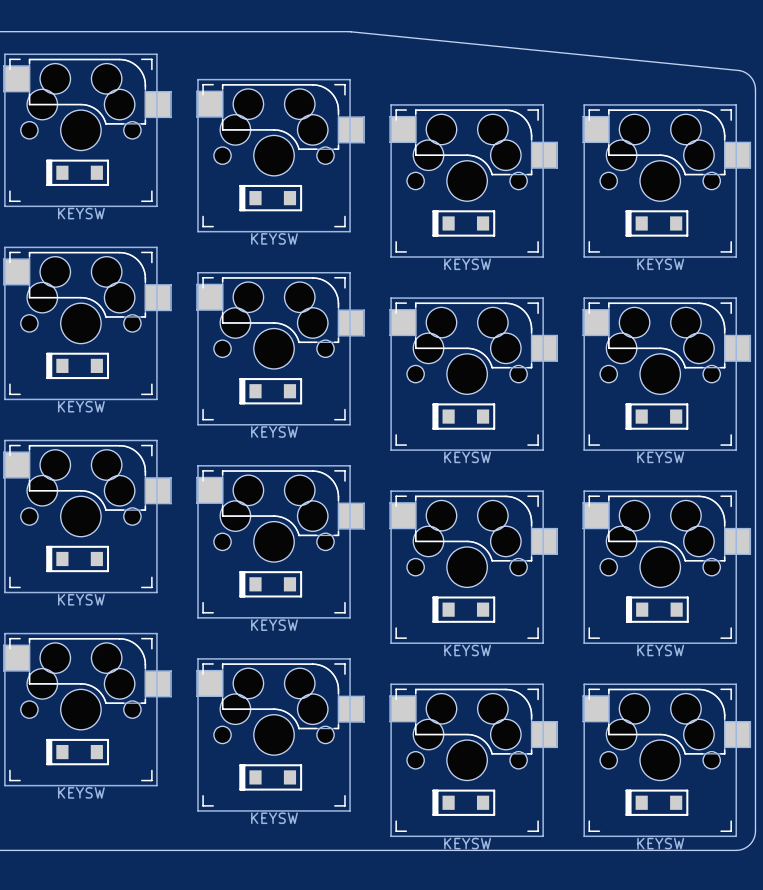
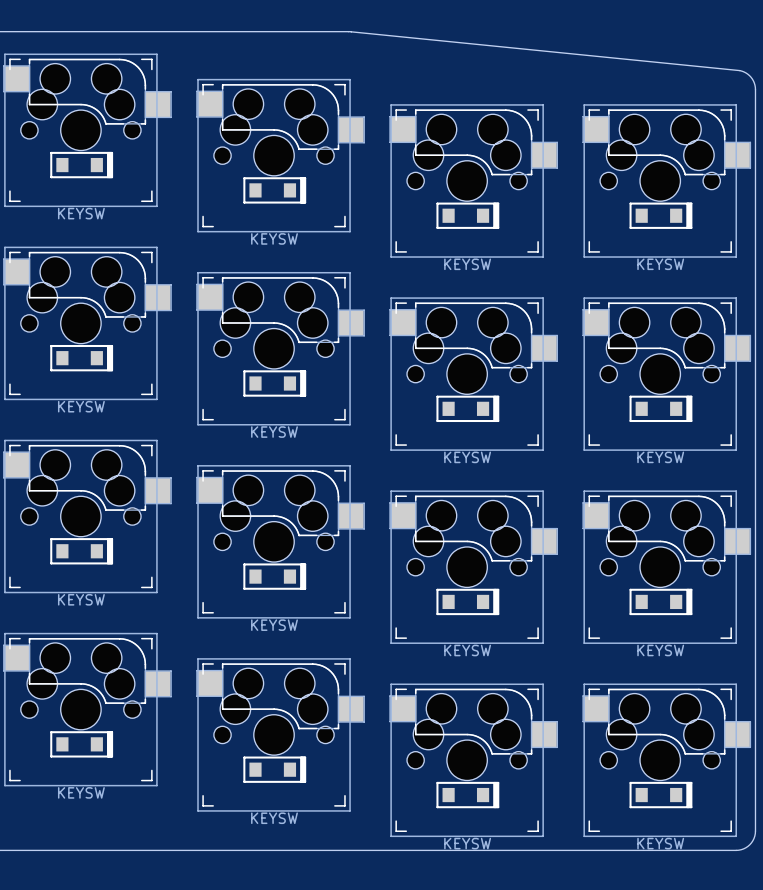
part side: top (77, 172) -> bottom (81, 165)
part side: top (270, 198) -> bottom (274, 190)
part side: top (463, 223) -> bottom (467, 215)
part side: top (656, 223) -> bottom (660, 215)
part side: top (77, 365) -> bottom (81, 358)
part side: top (270, 391) -> bottom (274, 383)
part side: top (463, 416) -> bottom (467, 408)
part side: top (656, 416) -> bottom (660, 408)
part side: top (77, 558) -> bottom (81, 551)
part side: top (270, 584) -> bottom (274, 576)
part side: top (463, 609) -> bottom (467, 601)
part side: top (657, 609) -> bottom (660, 601)
part side: top (77, 752) -> bottom (81, 744)
part side: top (270, 777) -> bottom (274, 769)
part side: top (463, 802) -> bottom (467, 795)
part side: top (656, 802) -> bottom (660, 795)

